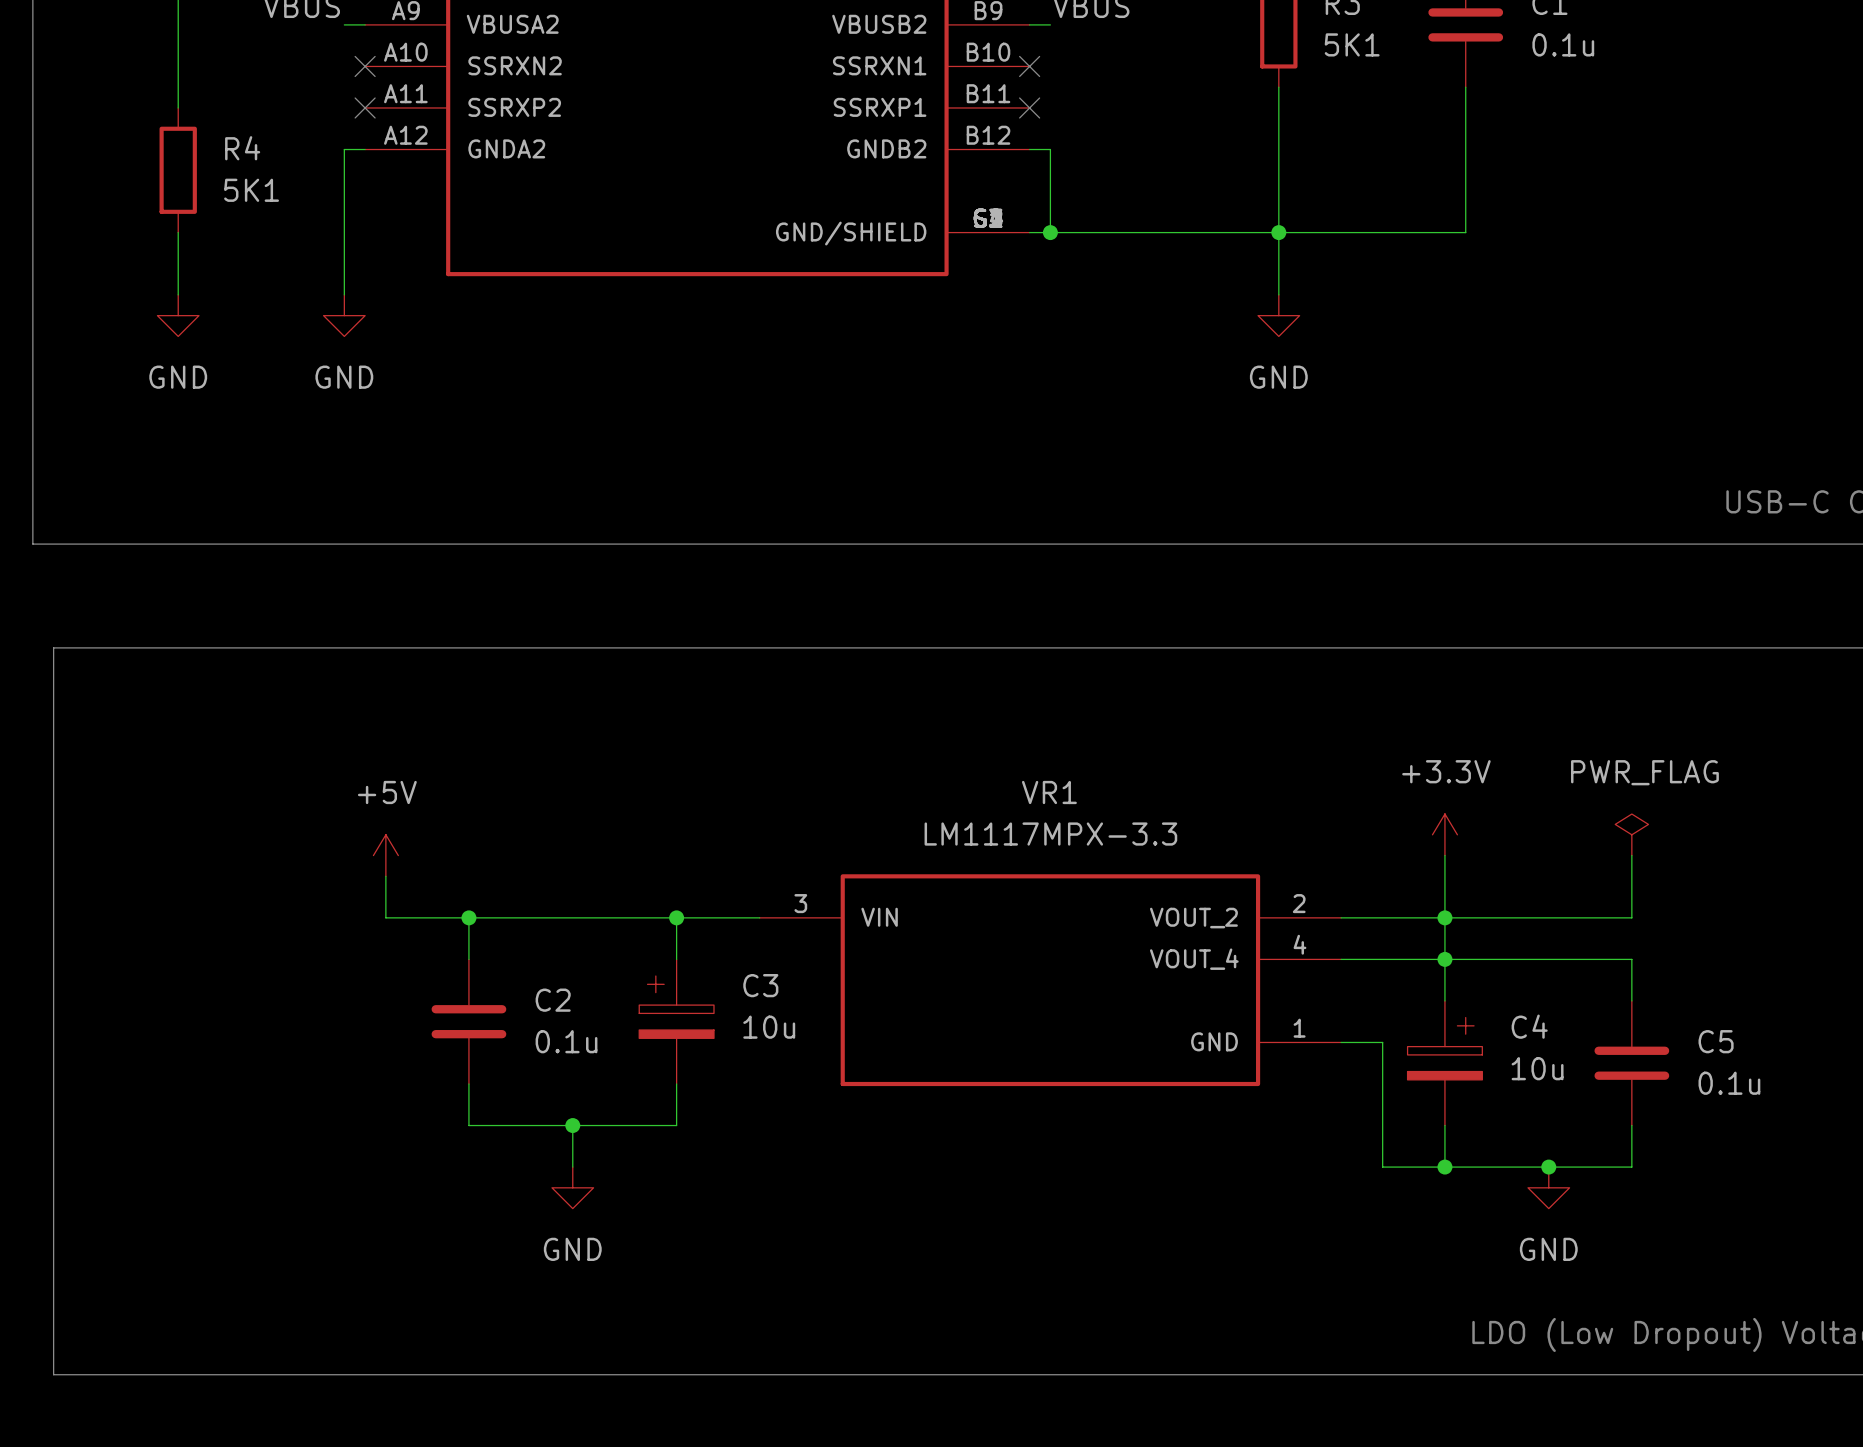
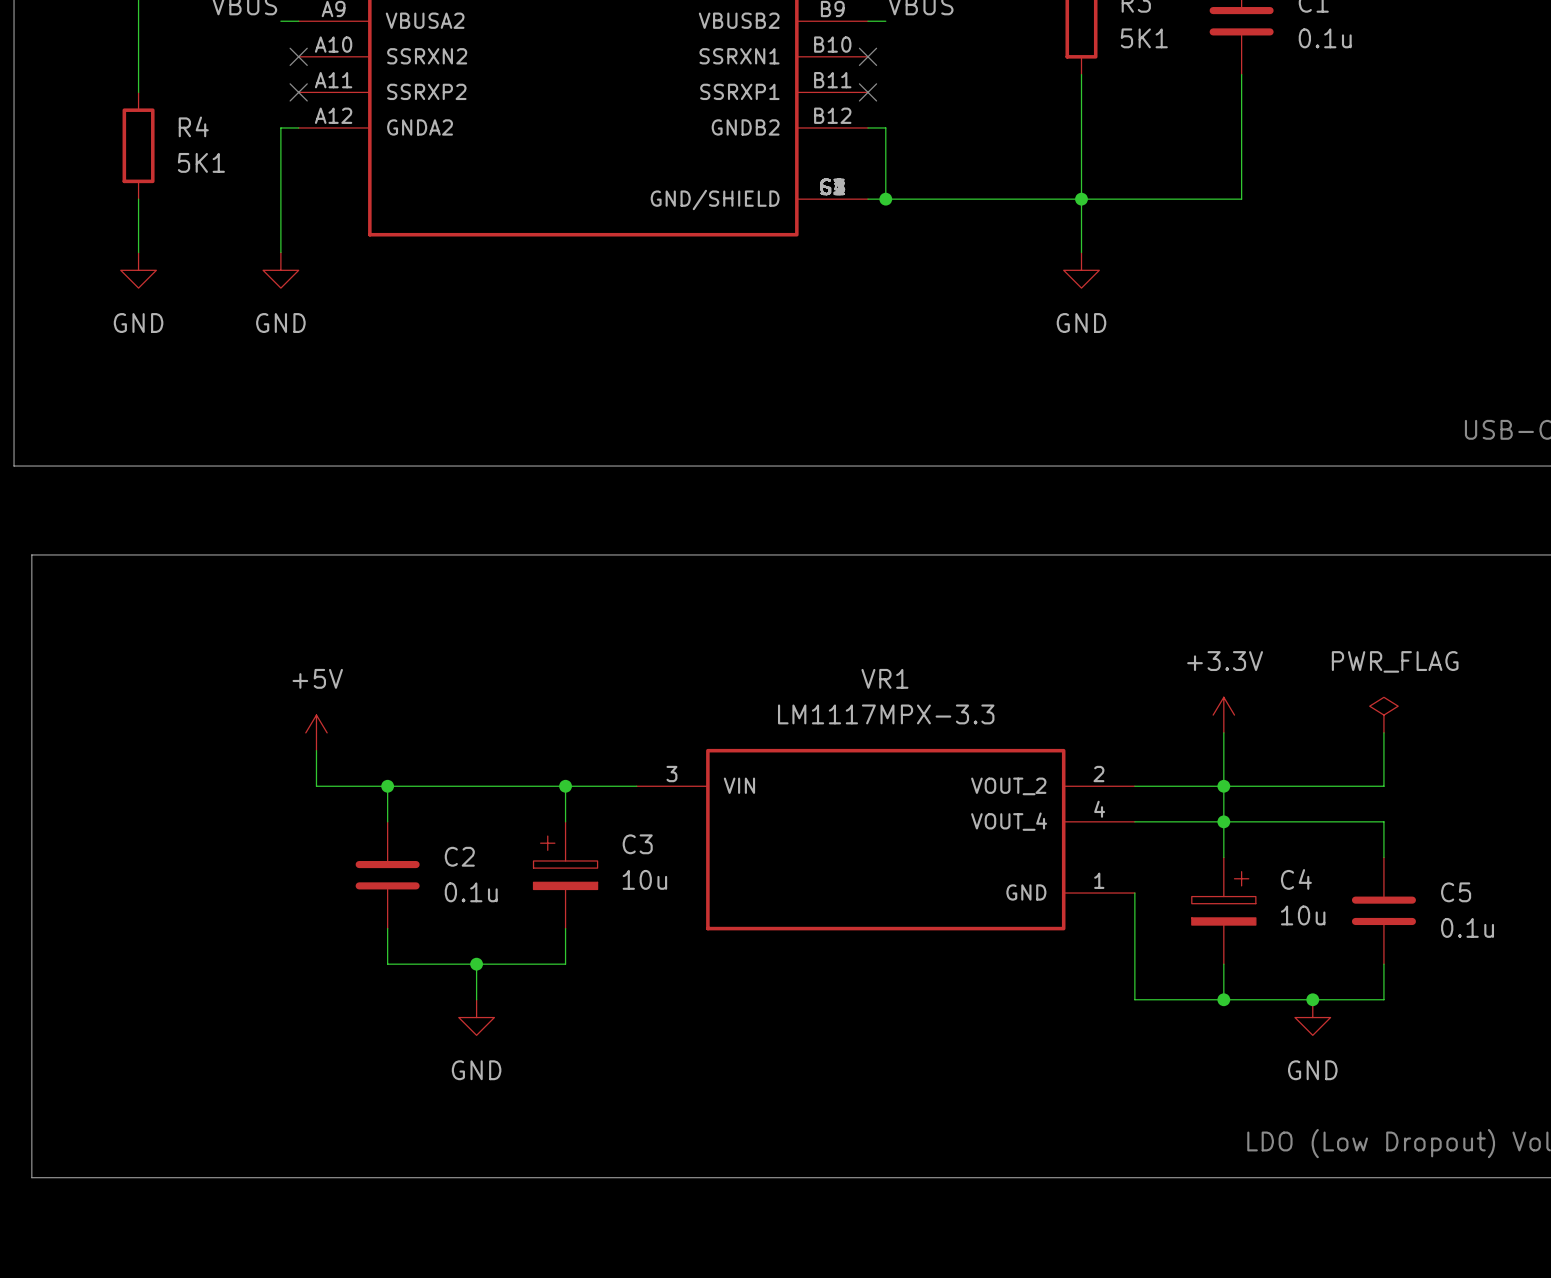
wire: (1341, 1042) (1382, 1042) (1382, 1167) -> (1134, 893) (1134, 999) (1170, 999)

